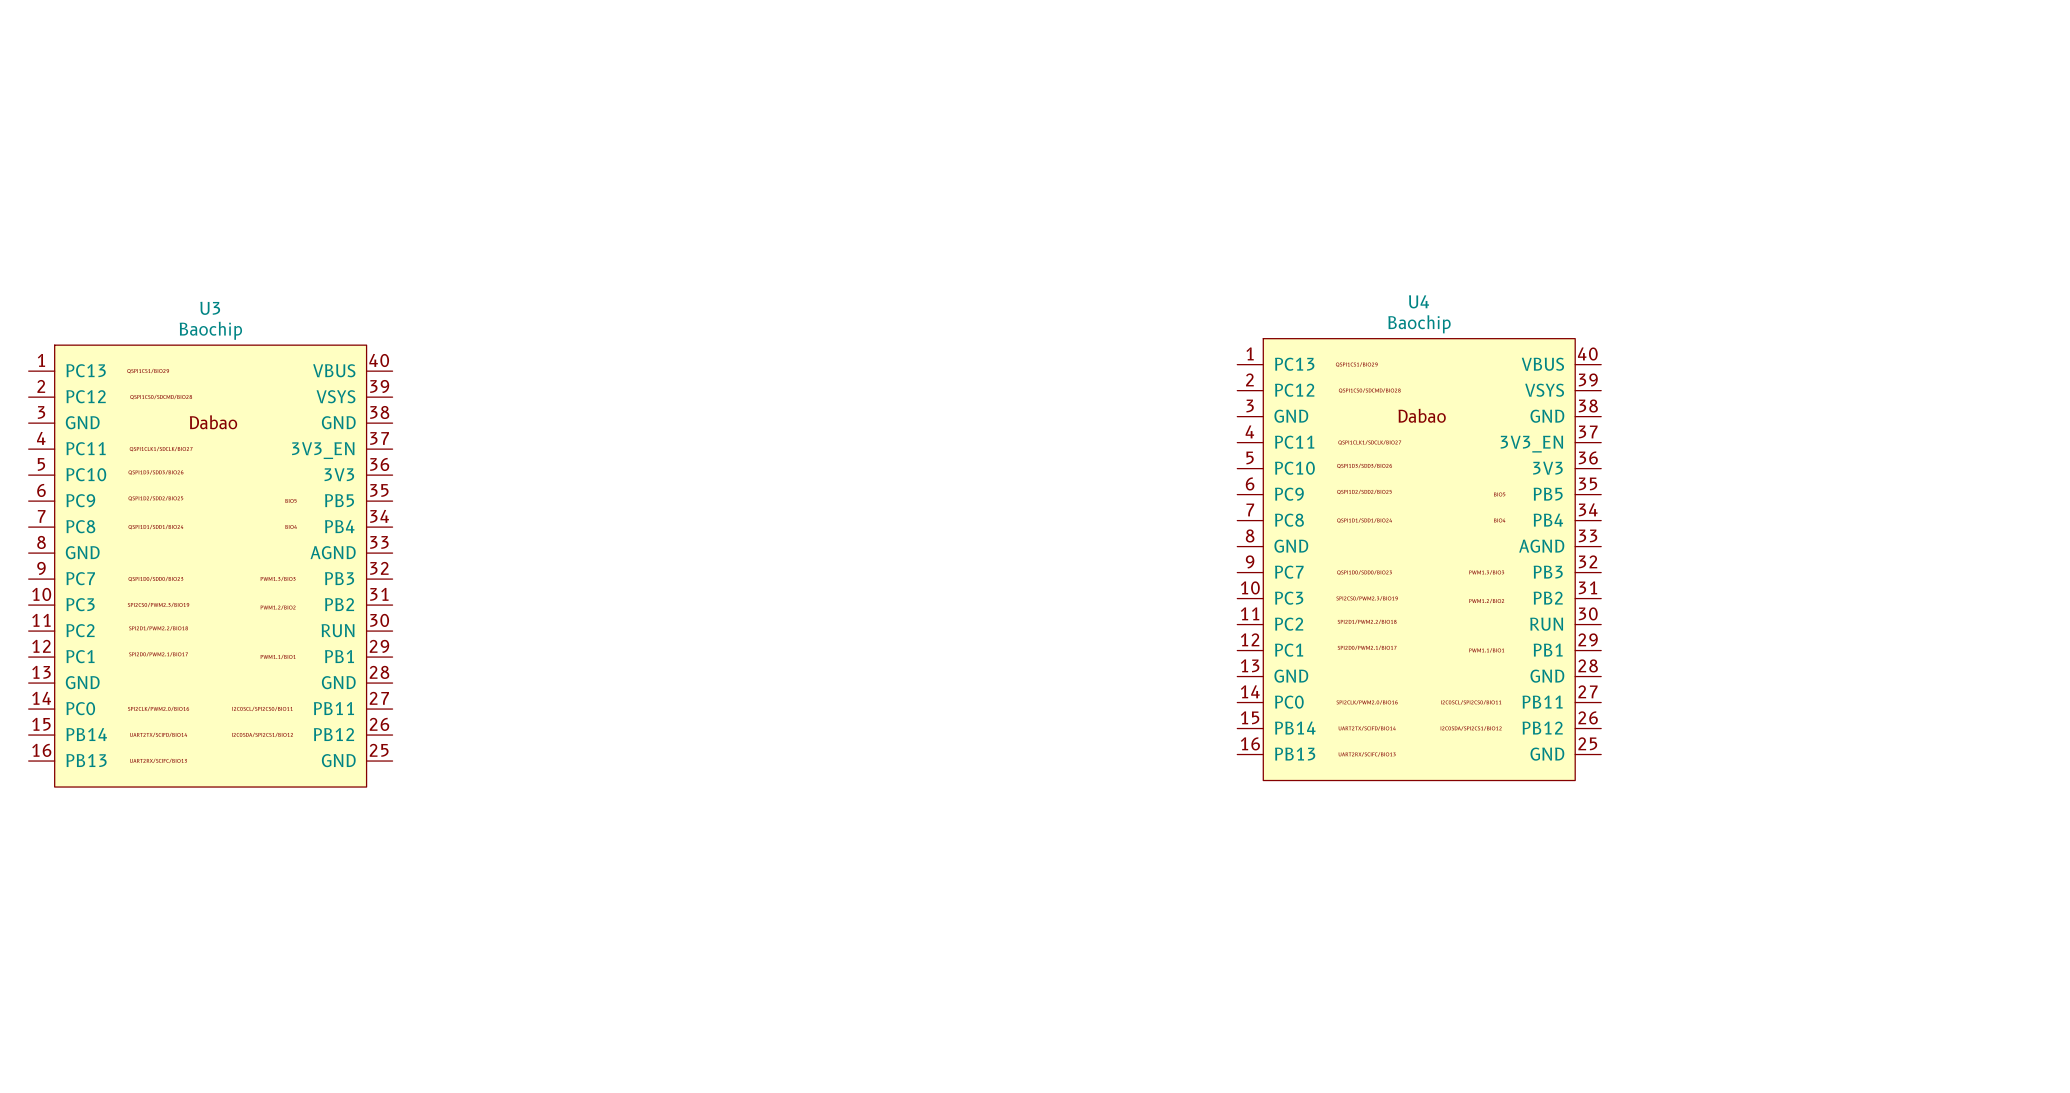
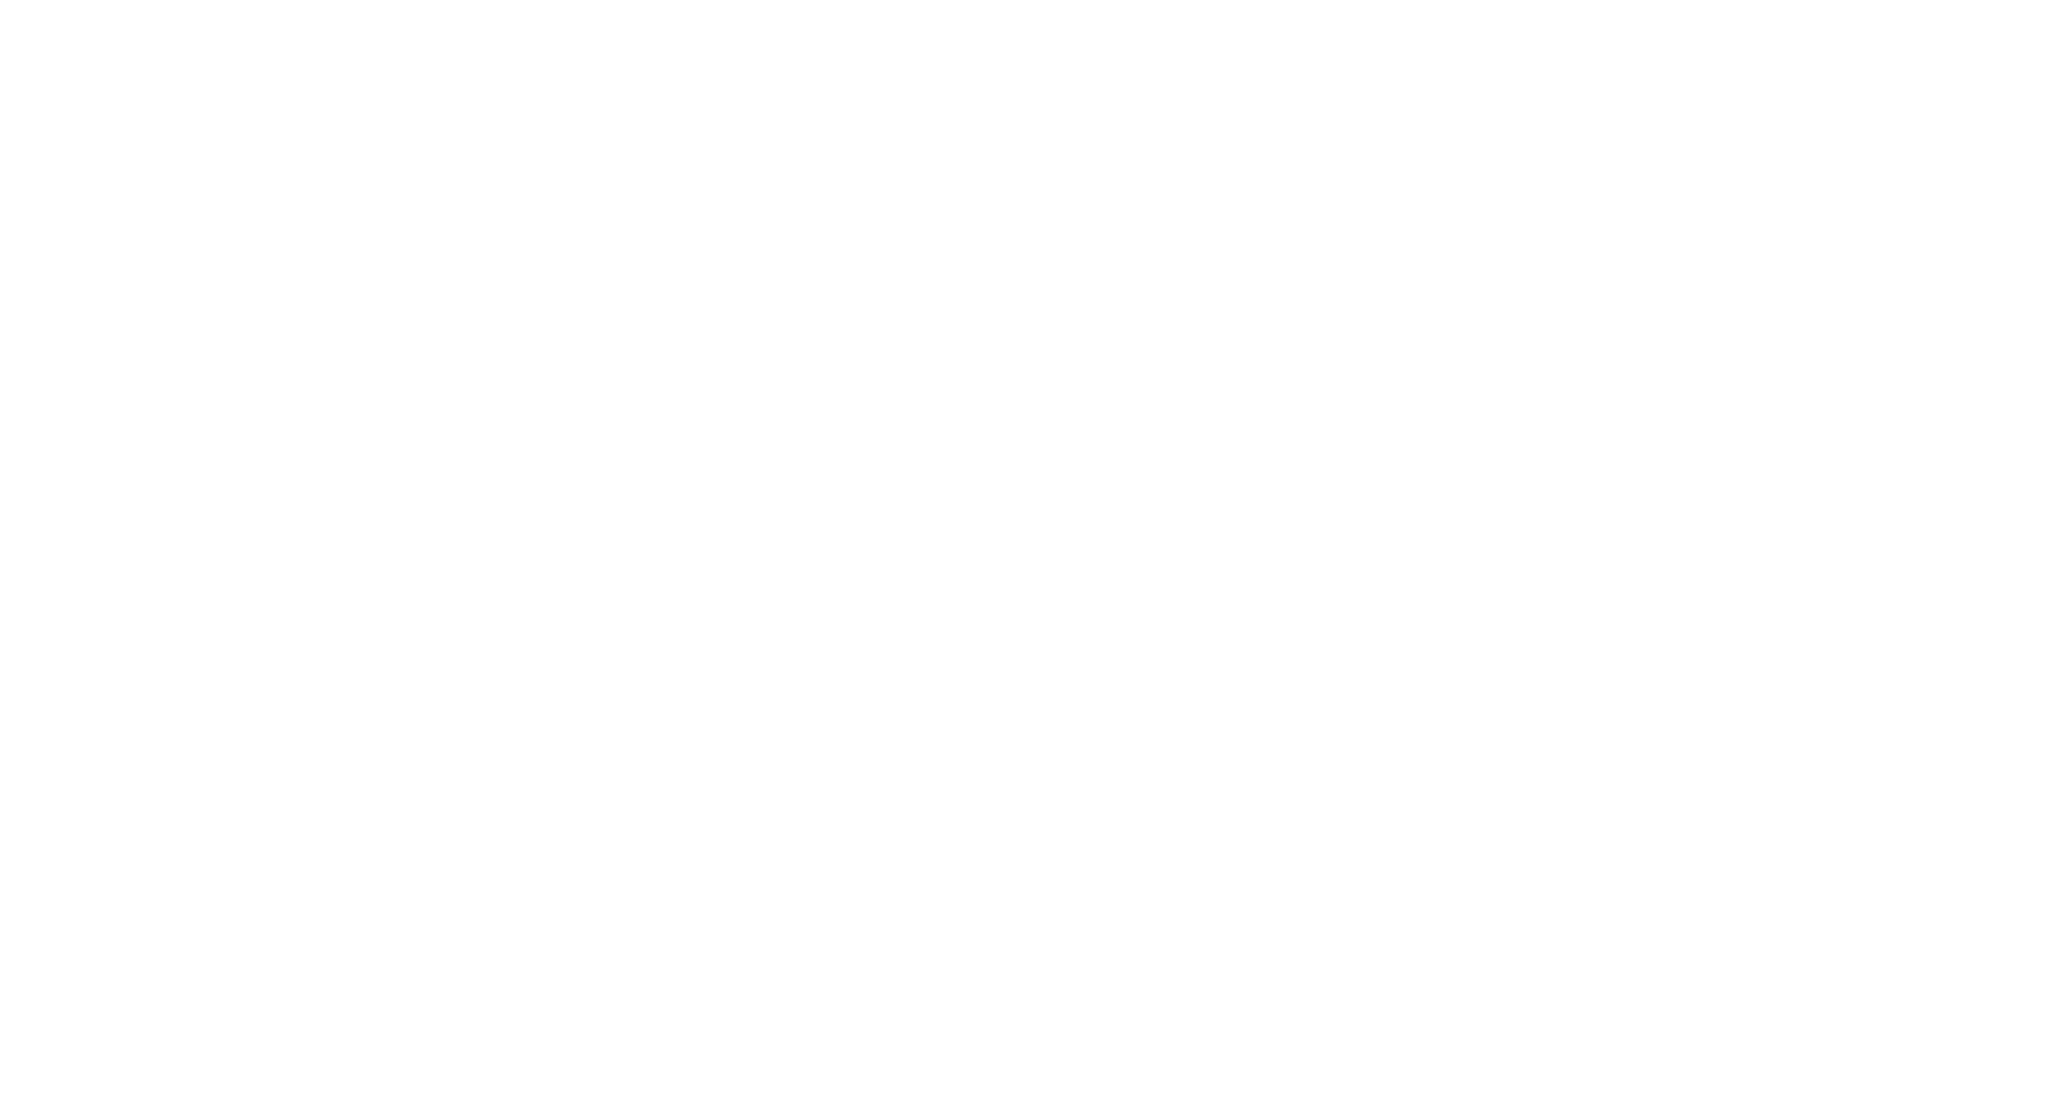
U4: Baochip (1419, 559) -> none
U3: Baochip (210, 566) -> none

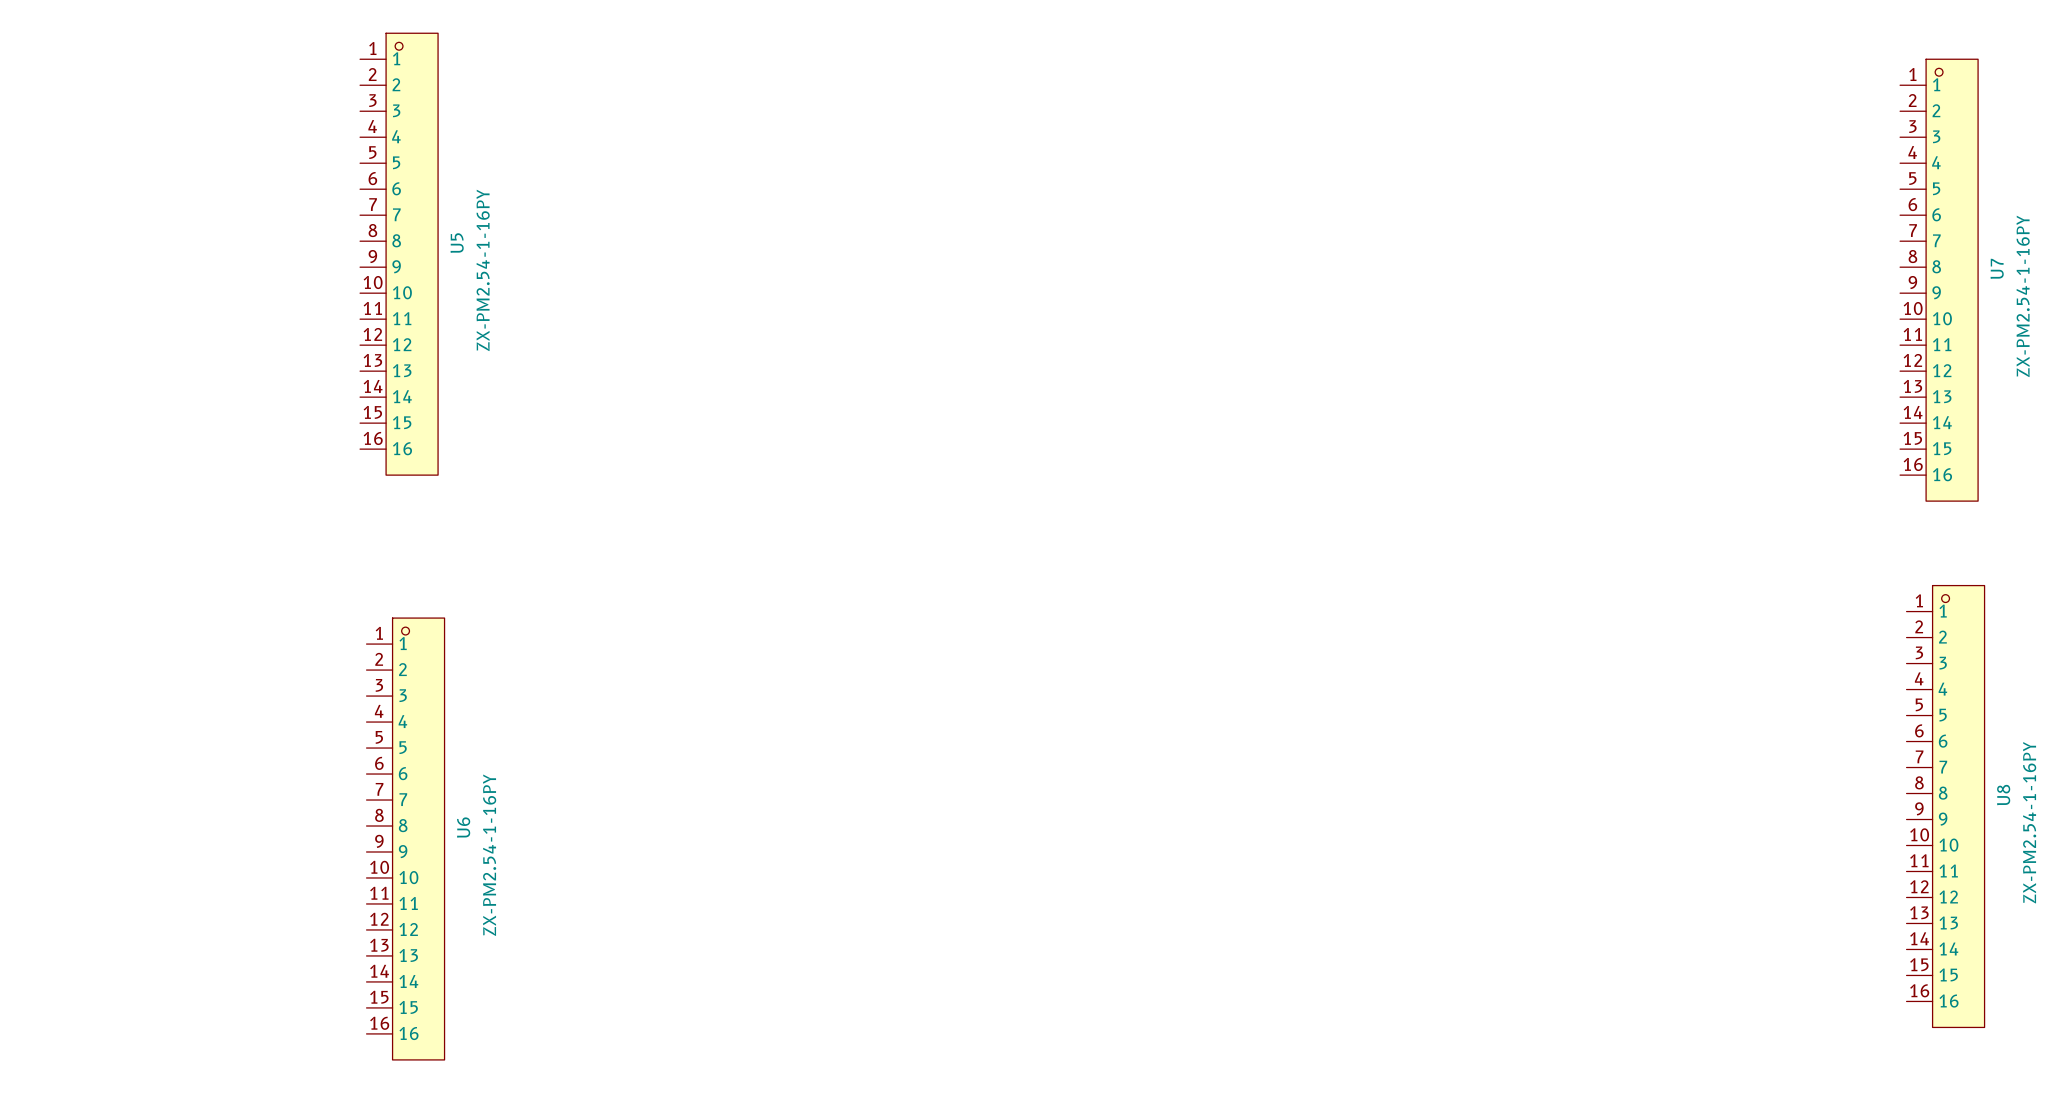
U5: none -> ZX-PM2.54-1-16PY (399, 254)
U7: none -> ZX-PM2.54-1-16PY (1939, 280)
U8: none -> ZX-PM2.54-1-16PY (1945, 806)
U6: none -> ZX-PM2.54-1-16PY (405, 839)

